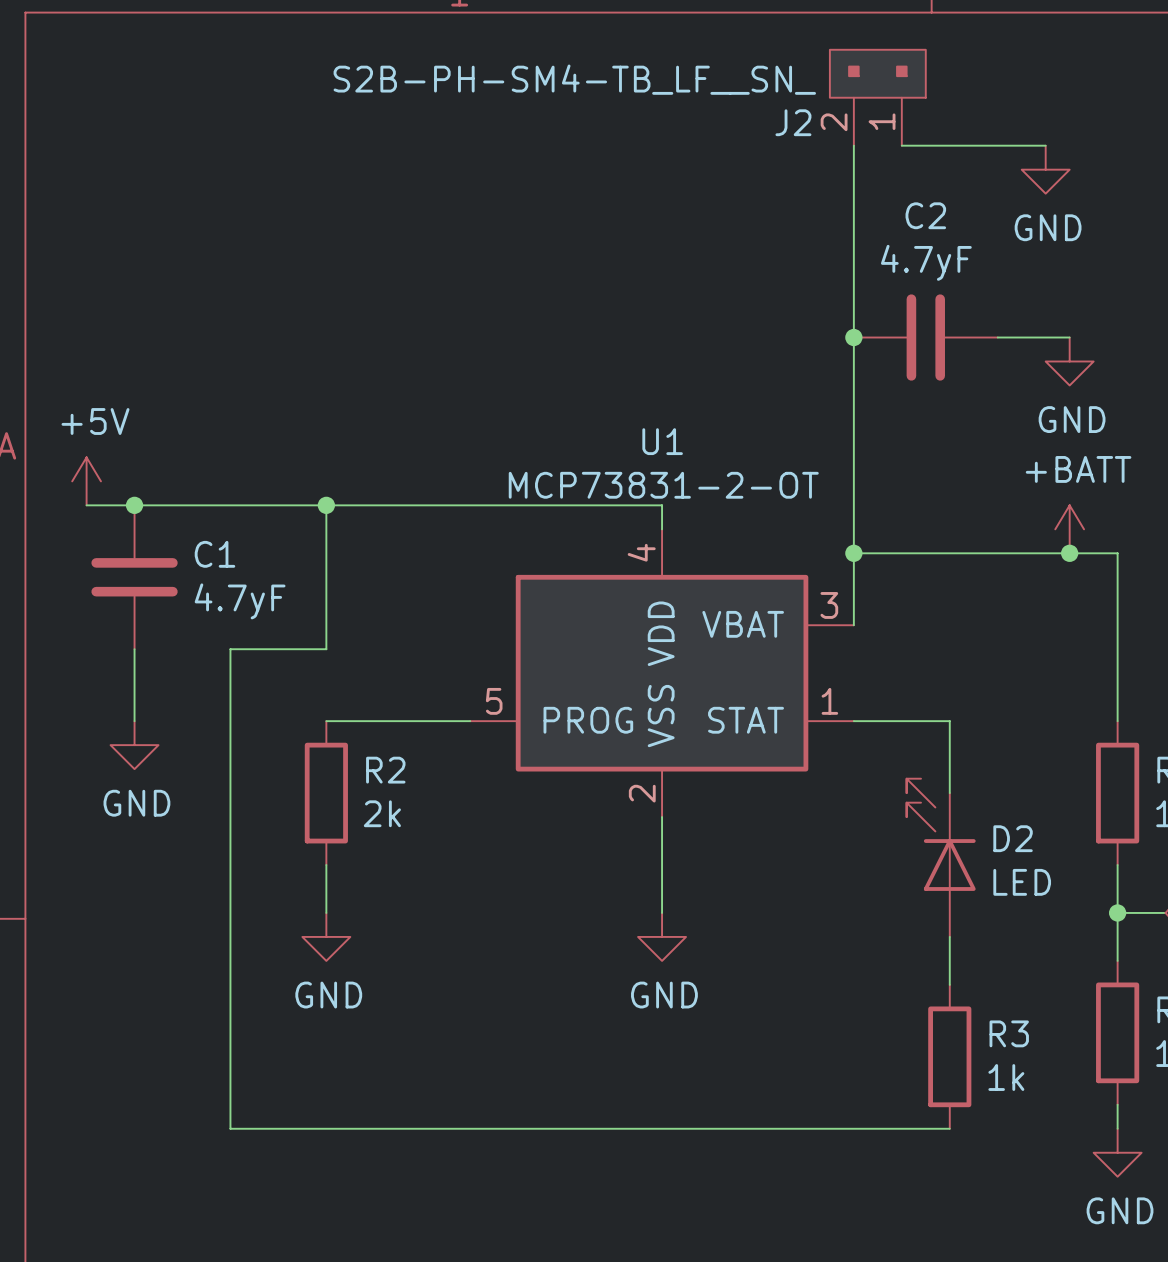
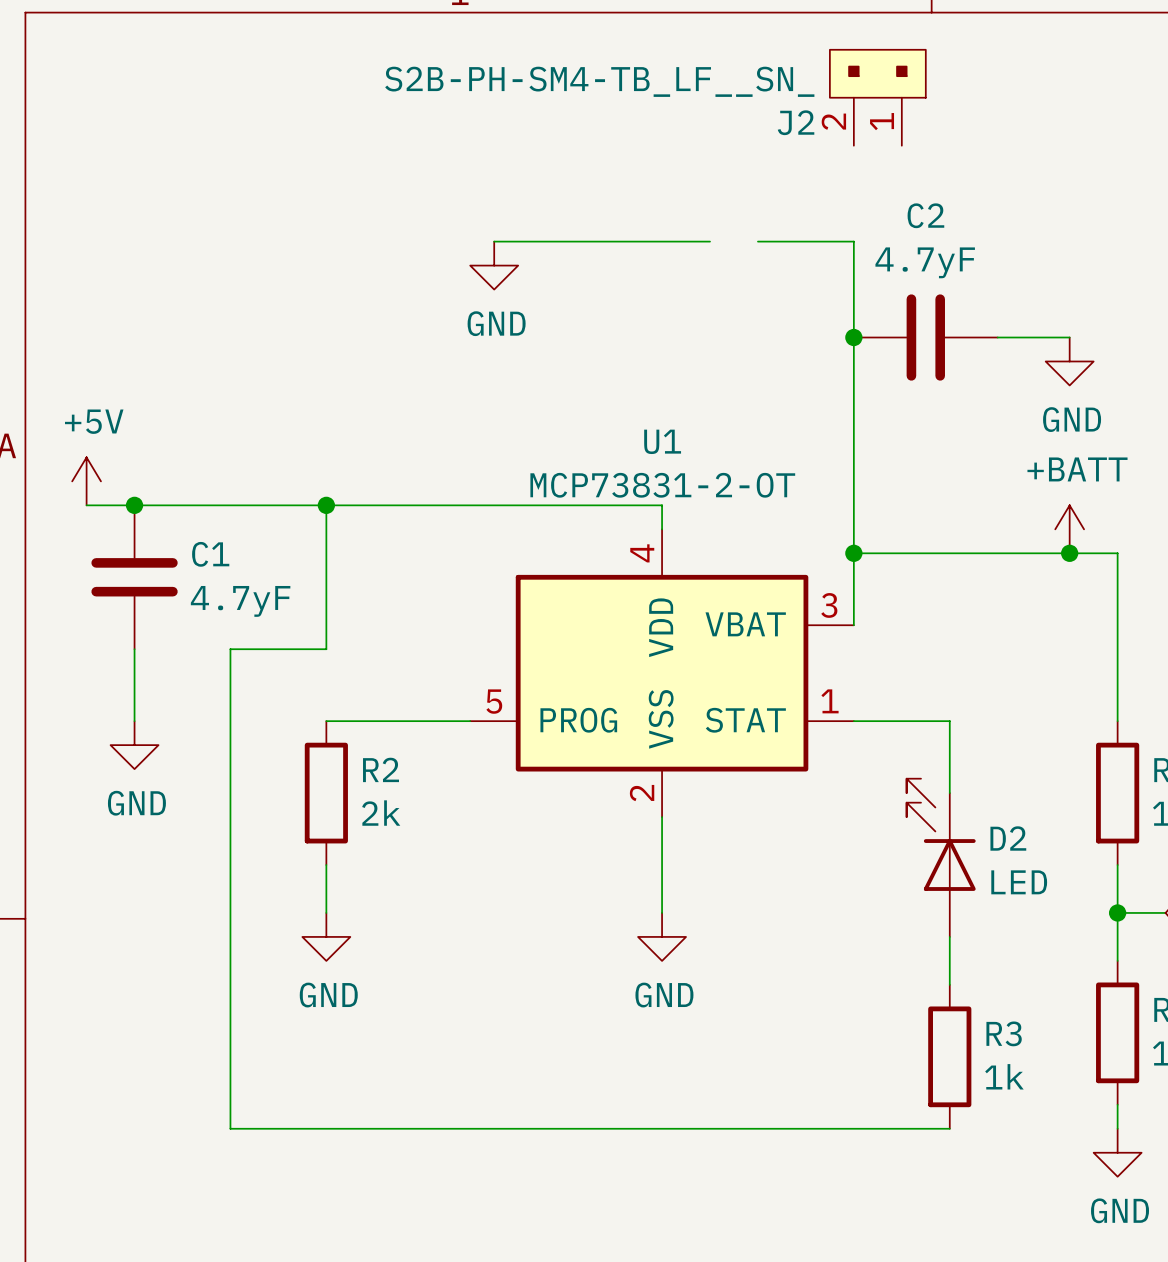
wire: (853, 145) (853, 241) -> (757, 241) (853, 241)
wire: (901, 145) (1045, 145) -> none
power symbol: GND (1045, 169) -> none
wire: none -> (494, 241) (710, 241)
power symbol: none -> GND (494, 265)

